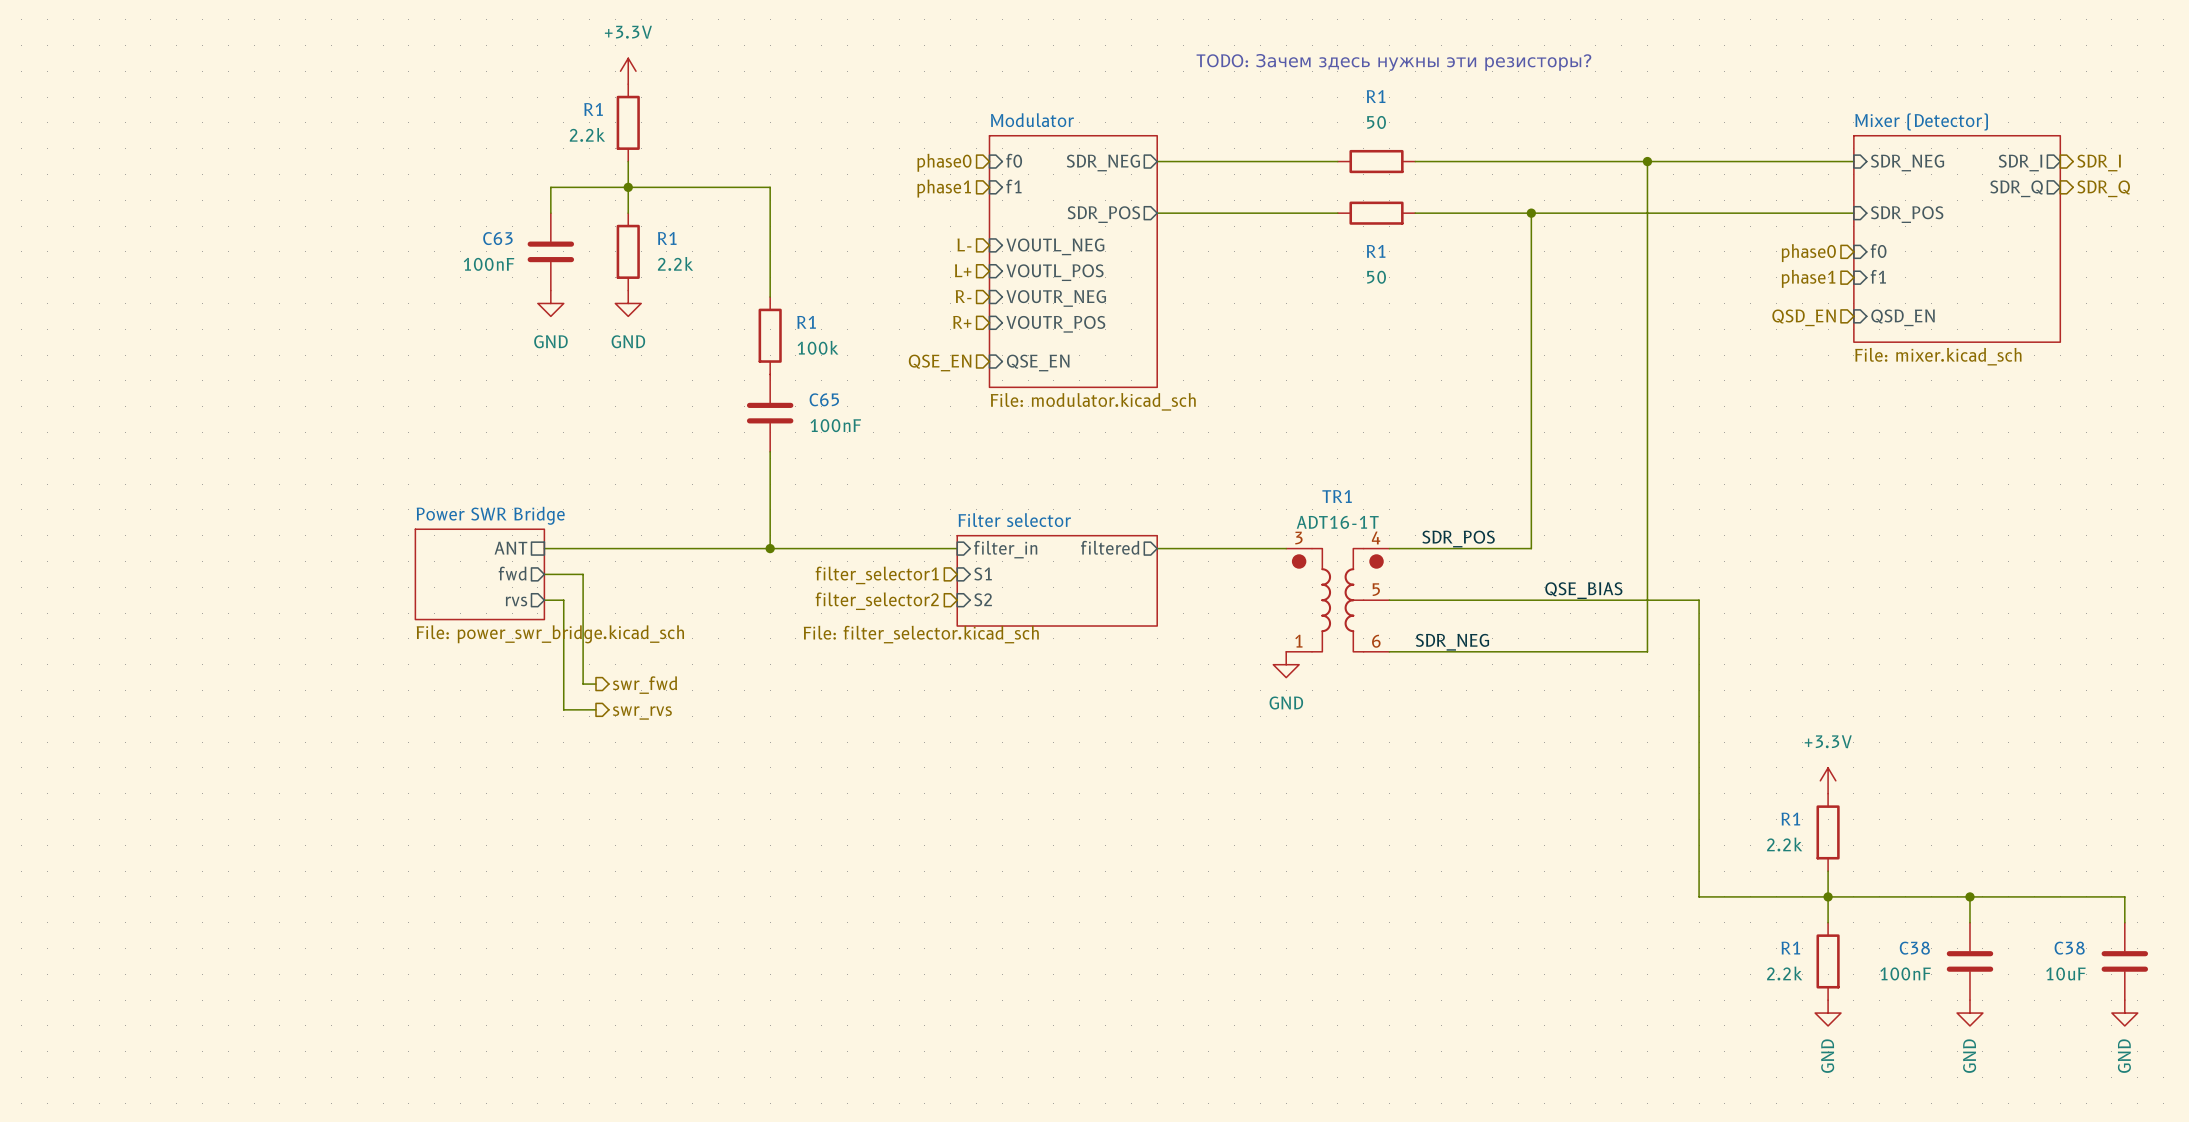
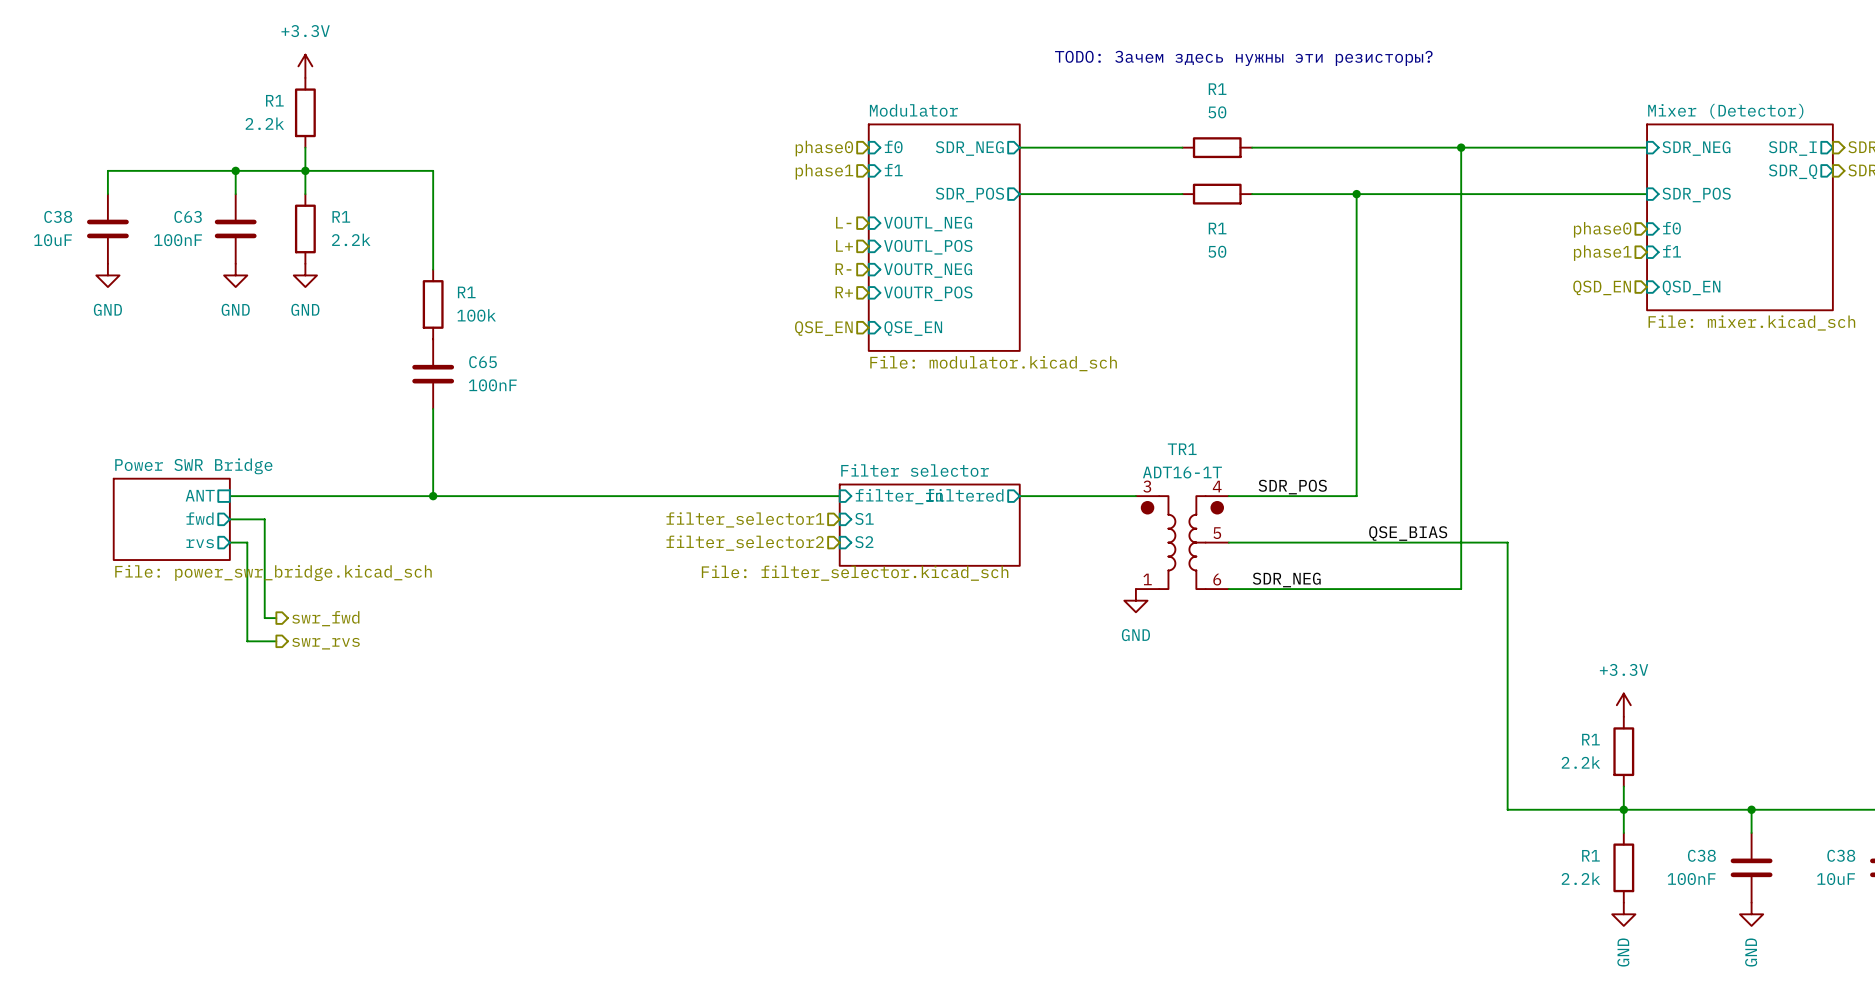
power symbol: none -> +3.3V (305, 66)
power symbol: +3.3V (628, 71) -> none
R1: none -> 2.2k (305, 112)
R1: 2.2k (628, 122) -> none
wire: none -> (305, 147) (305, 194)
wire: (628, 161) (628, 213) -> none
wire: none -> (235, 170) (235, 194)
junction: none -> (235, 170)
junction: none -> (305, 170)
junction: (628, 187) -> none
wire: none -> (107, 194) (107, 170) (433, 170) (433, 269)
wire: (550, 213) (550, 187) (770, 187) (770, 297) -> none
C38: none -> 10uF (107, 228)
R1: none -> 2.2k (305, 228)
C63 position: (550, 251) -> (235, 228)
R1: 2.2k (628, 251) -> none
power symbol: none -> GND (107, 275)
power symbol: none -> GND (235, 275)
power symbol: none -> GND (305, 275)
power symbol: GND (550, 303) -> none
power symbol: GND (628, 303) -> none
R1: none -> 100k (433, 304)
R1: 100k (770, 335) -> none
C65 position: (770, 413) -> (433, 374)
wire: none -> (433, 409) (433, 496)
wire: (770, 451) (770, 548) -> none
sheet pin: none -> ANT (200, 495)
wire: none -> (229, 496) (468, 496)
junction: none -> (433, 496)
sheet pin: ANT (510, 548) -> none
junction: (770, 548) -> none
sheet pin: none -> fwd (199, 518)
sheet pin: fwd (512, 573) -> none
sheet Power SWR Bridge: none -> File: power_swr_bridge.kicad_sch (171, 519)
wire: none -> (229, 519) (264, 519) (264, 618) (276, 618)
sheet Power SWR Bridge: File: power_swr_bridge.kicad_sch (479, 574) -> none
wire: (544, 574) (583, 574) (583, 684) (595, 684) -> none
wire: none -> (229, 542) (247, 542) (247, 641) (276, 641)
wire: (544, 600) (563, 600) (563, 709) (595, 709) -> none
sheet pin: none -> rvs (200, 543)
sheet pin: rvs (516, 601) -> none
hierarchical label: none -> swr_fwd (325, 618)
hierarchical label: swr_fwd (644, 685) -> none
hierarchical label: none -> swr_rvs (325, 643)
hierarchical label: swr_rvs (642, 713) -> none

